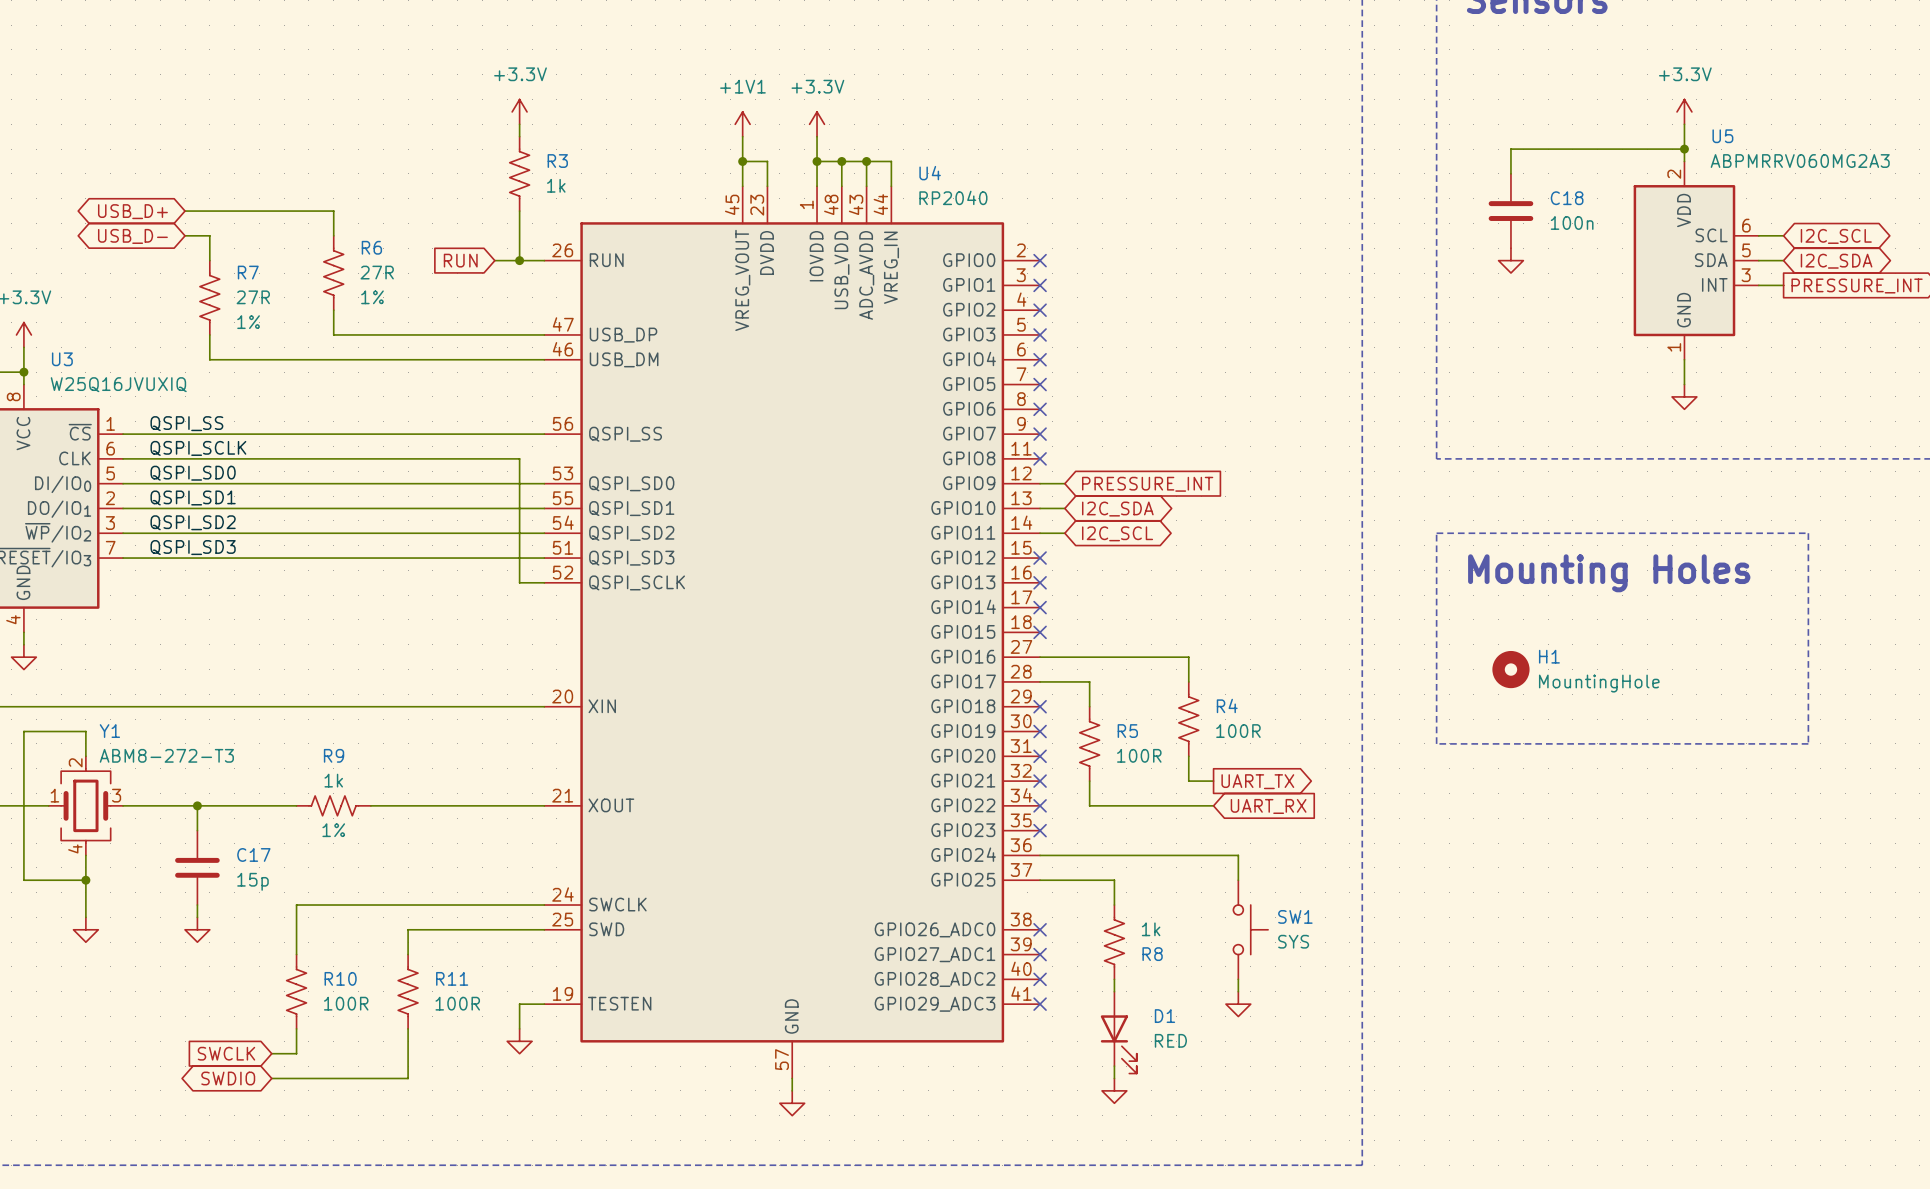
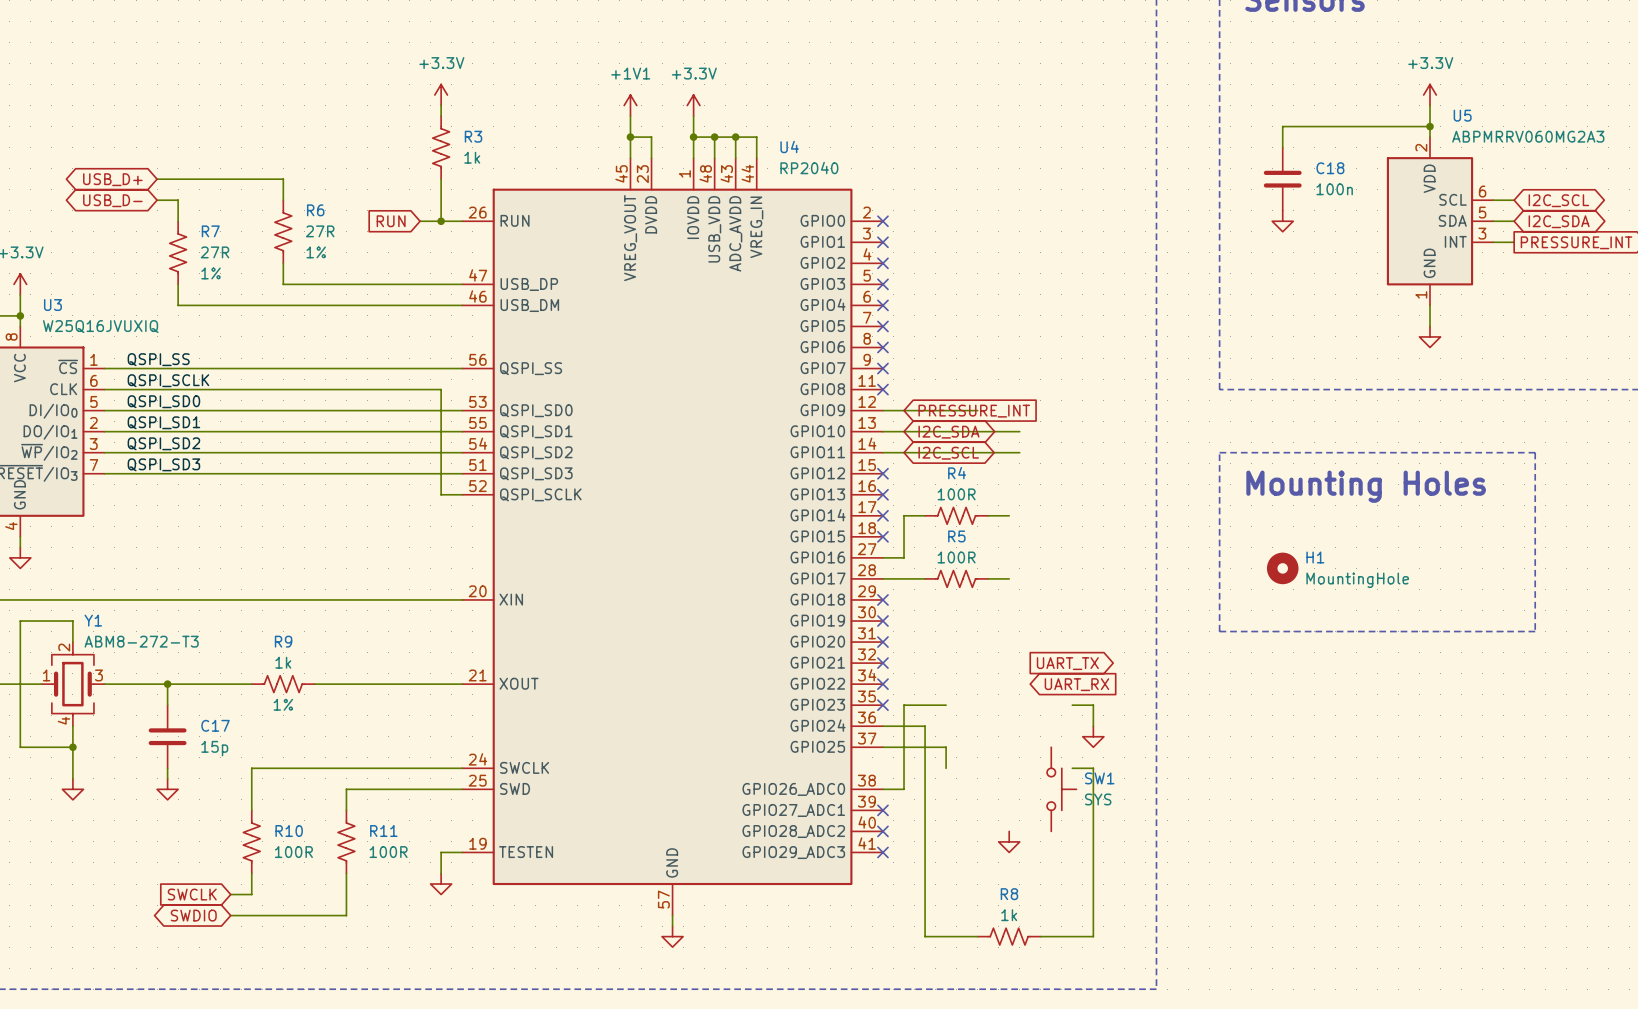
wire: none -> (904, 410) (977, 410)
wire: none -> (904, 431) (1019, 431)
wire: none -> (904, 452) (1019, 452)
wire: none -> (925, 515) (904, 515) (904, 557)
wire: none -> (988, 515) (1009, 515)
wire: (1064, 657) (1188, 657) (1188, 681) -> (988, 578) (1009, 578)
wire: (1089, 681) (1089, 706) -> none
R4 name position: R4 (1227, 705) -> R4 (957, 473)
R4 rotation: 0° (1188, 719) -> 90° clockwise (956, 515)
R4 position: (1188, 719) -> (956, 515)
R5 name position: R5 (1127, 731) -> R5 (956, 536)
R4 value position: 100R (1238, 731) -> 100R (956, 494)
R5 rotation: 0° (1089, 743) -> 90° clockwise (956, 578)
R5 position: (1089, 743) -> (956, 578)
R5 value position: 100R (1139, 755) -> 100R (956, 557)
wire: (1188, 756) (1188, 781) (1213, 781) -> none
wire: (1089, 781) (1089, 805) (1213, 805) -> none
wire: none -> (946, 705) (904, 705) (904, 789) (882, 789)
wire: none -> (1072, 705) (1093, 705) (1093, 726)
wire: (1089, 855) (1238, 855) (1238, 880) -> (925, 726) (925, 936) (977, 936)
power symbol: none -> (1093, 736)
wire: none -> (1072, 768) (1093, 768) (1093, 936) (1040, 936)
no-connect mark: (1040, 929) -> none
R8 value position: 1k (1151, 929) -> 1k (1009, 915)
R8 rotation: 0° (1114, 942) -> 90° clockwise (1009, 936)
R8 position: (1114, 942) -> (1009, 936)
R8 name position: R8 (1152, 954) -> R8 (1009, 894)
wire: (1114, 979) (1114, 991) -> none
wire: (1238, 979) (1238, 991) -> none
power symbol position: (1238, 1004) -> (1009, 841)
D1: RED (1118, 1032) -> none
wire: (1114, 1066) (1114, 1078) -> none
power symbol: (1114, 1090) -> none

